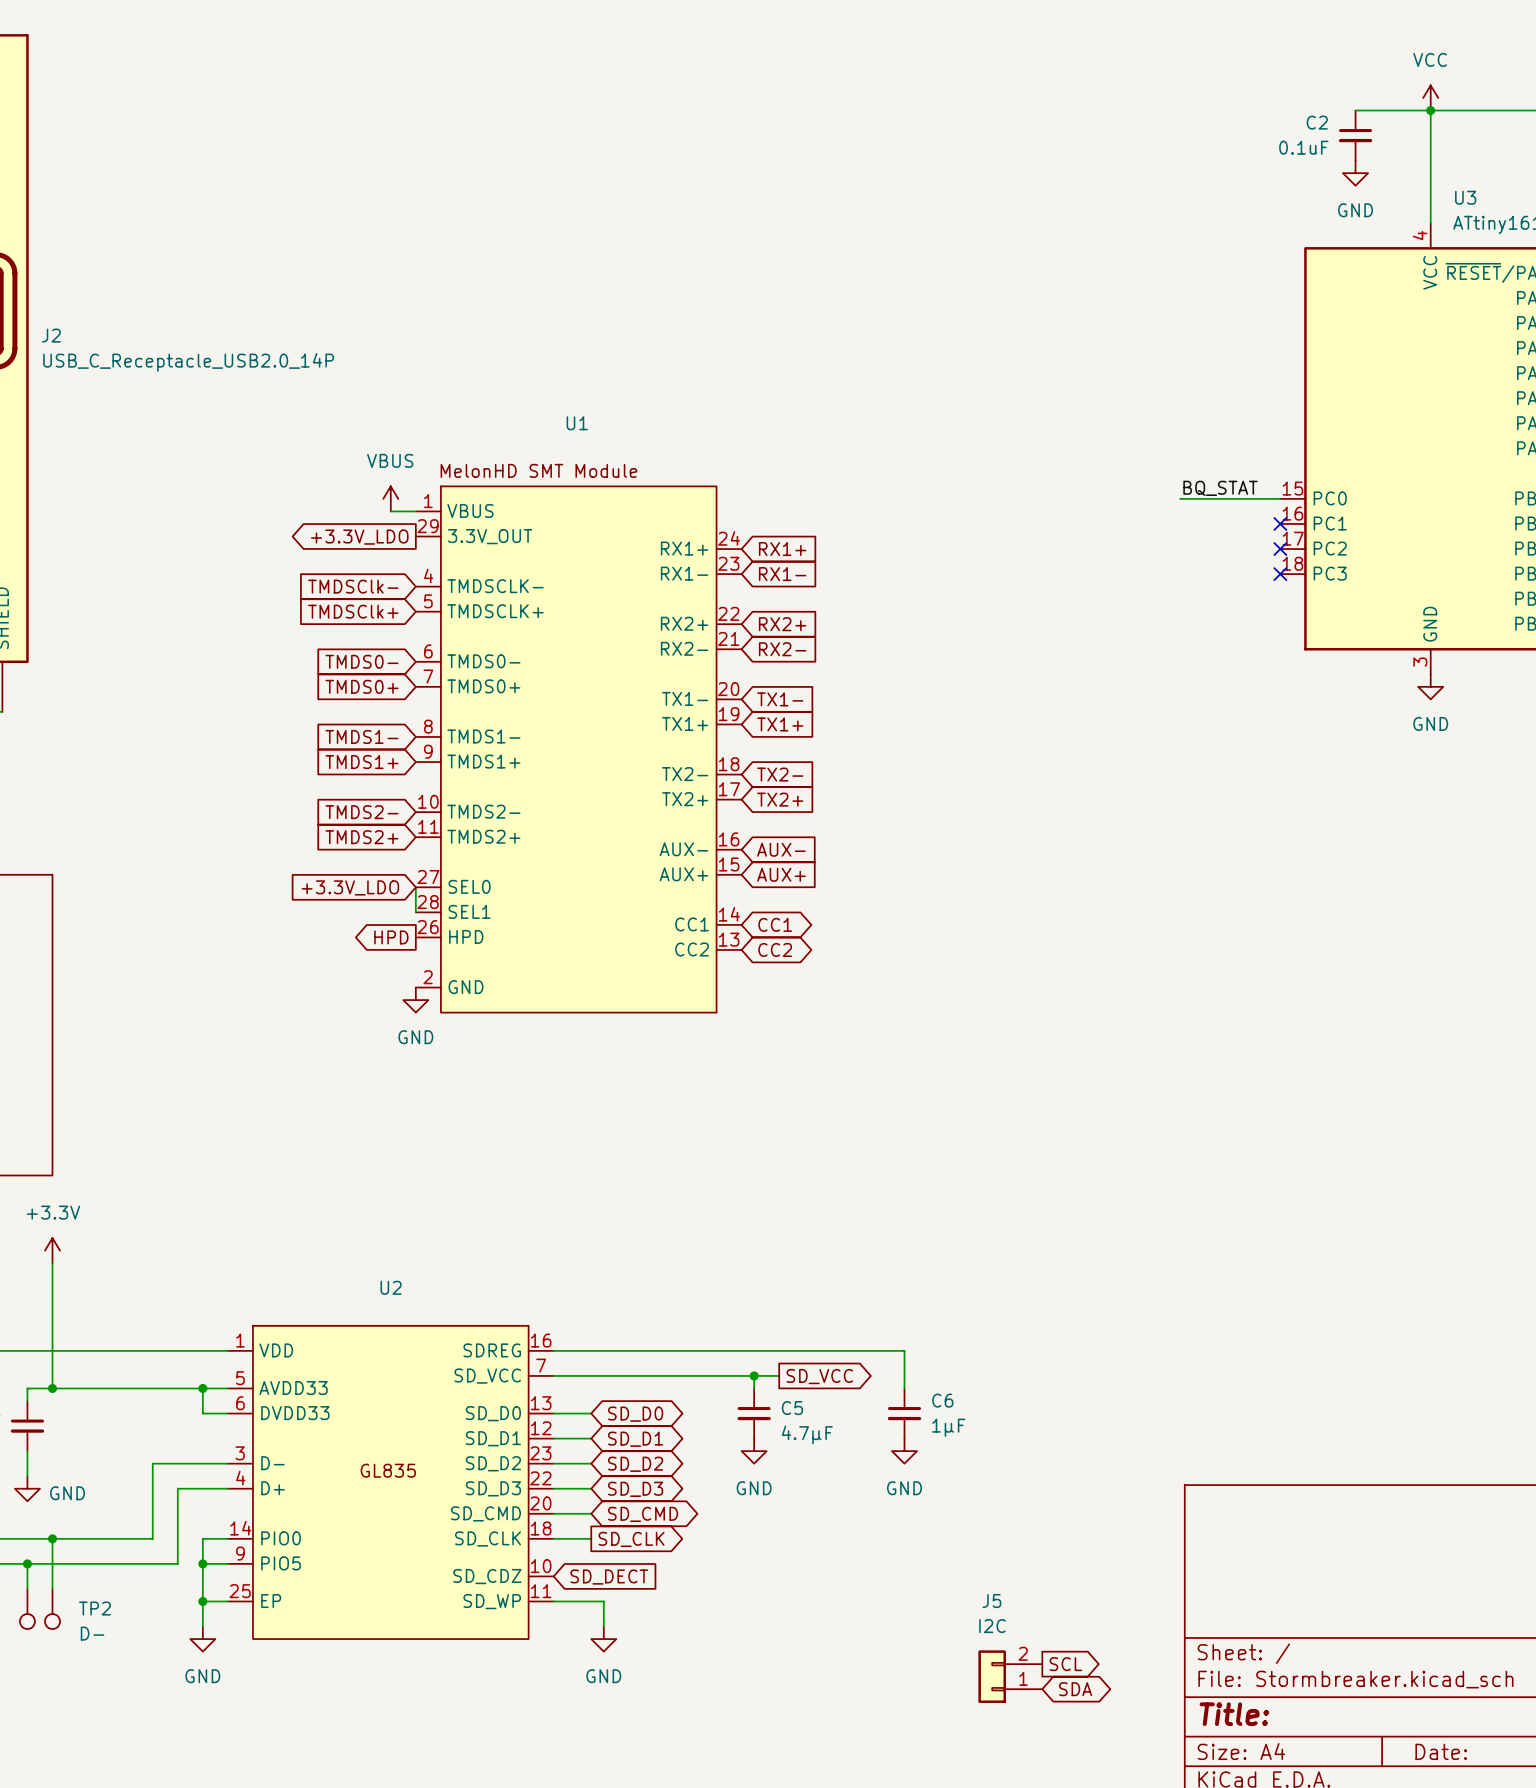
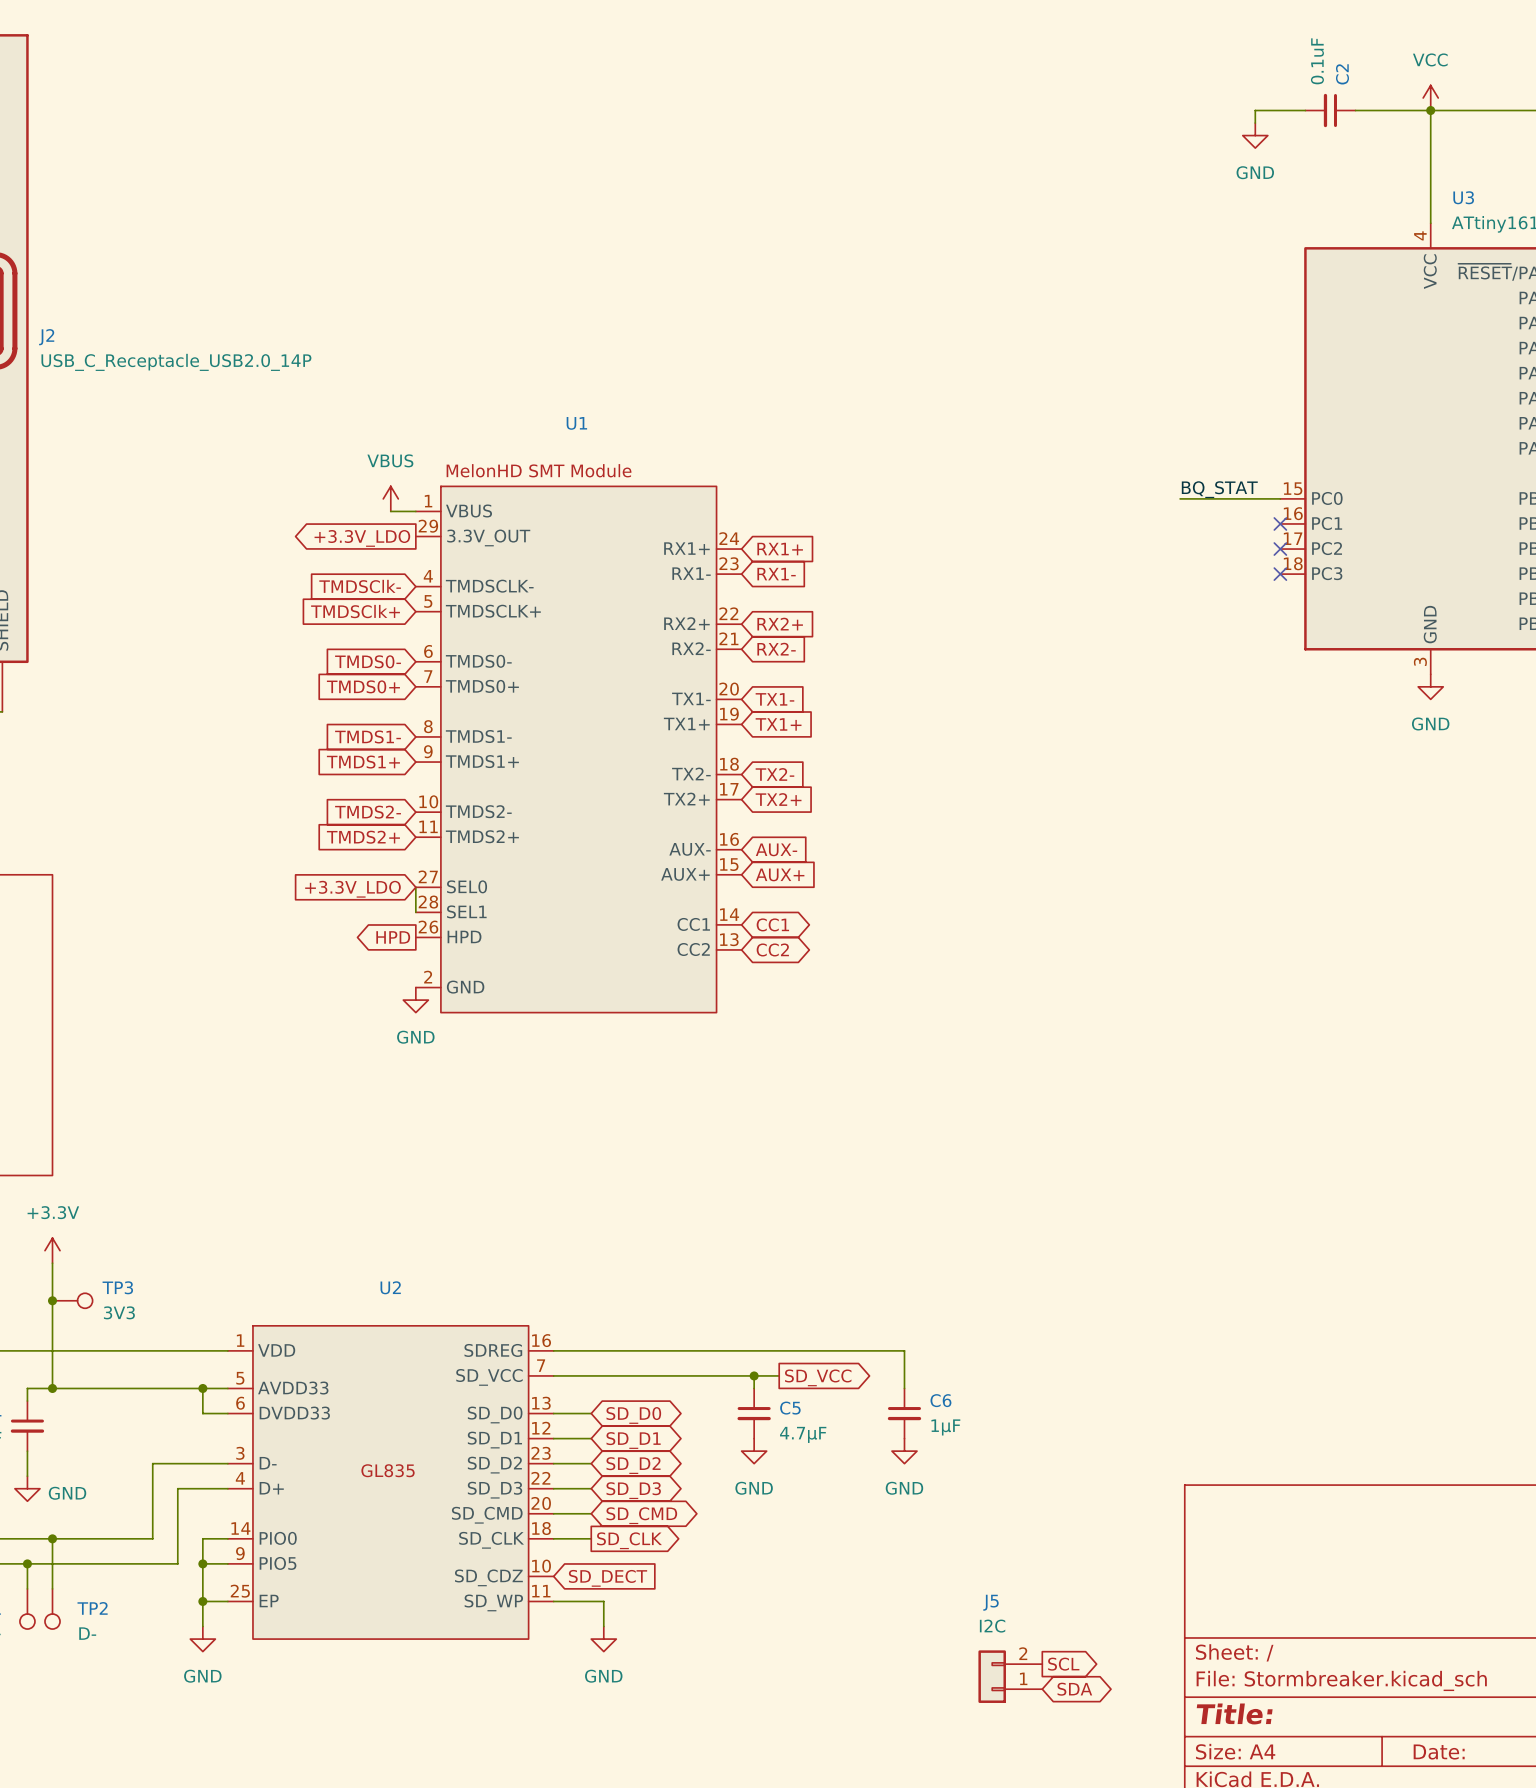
wire: none -> (1305, 110) (1255, 110) (1255, 123)
C2 rotation: 0° (1355, 135) -> 90° clockwise (1330, 110)
C2 position: (1355, 135) -> (1330, 110)
power symbol position: GND (1355, 173) -> GND (1255, 135)
junction: none -> (52, 1300)
TP3: none -> 3V3 (72, 1300)

